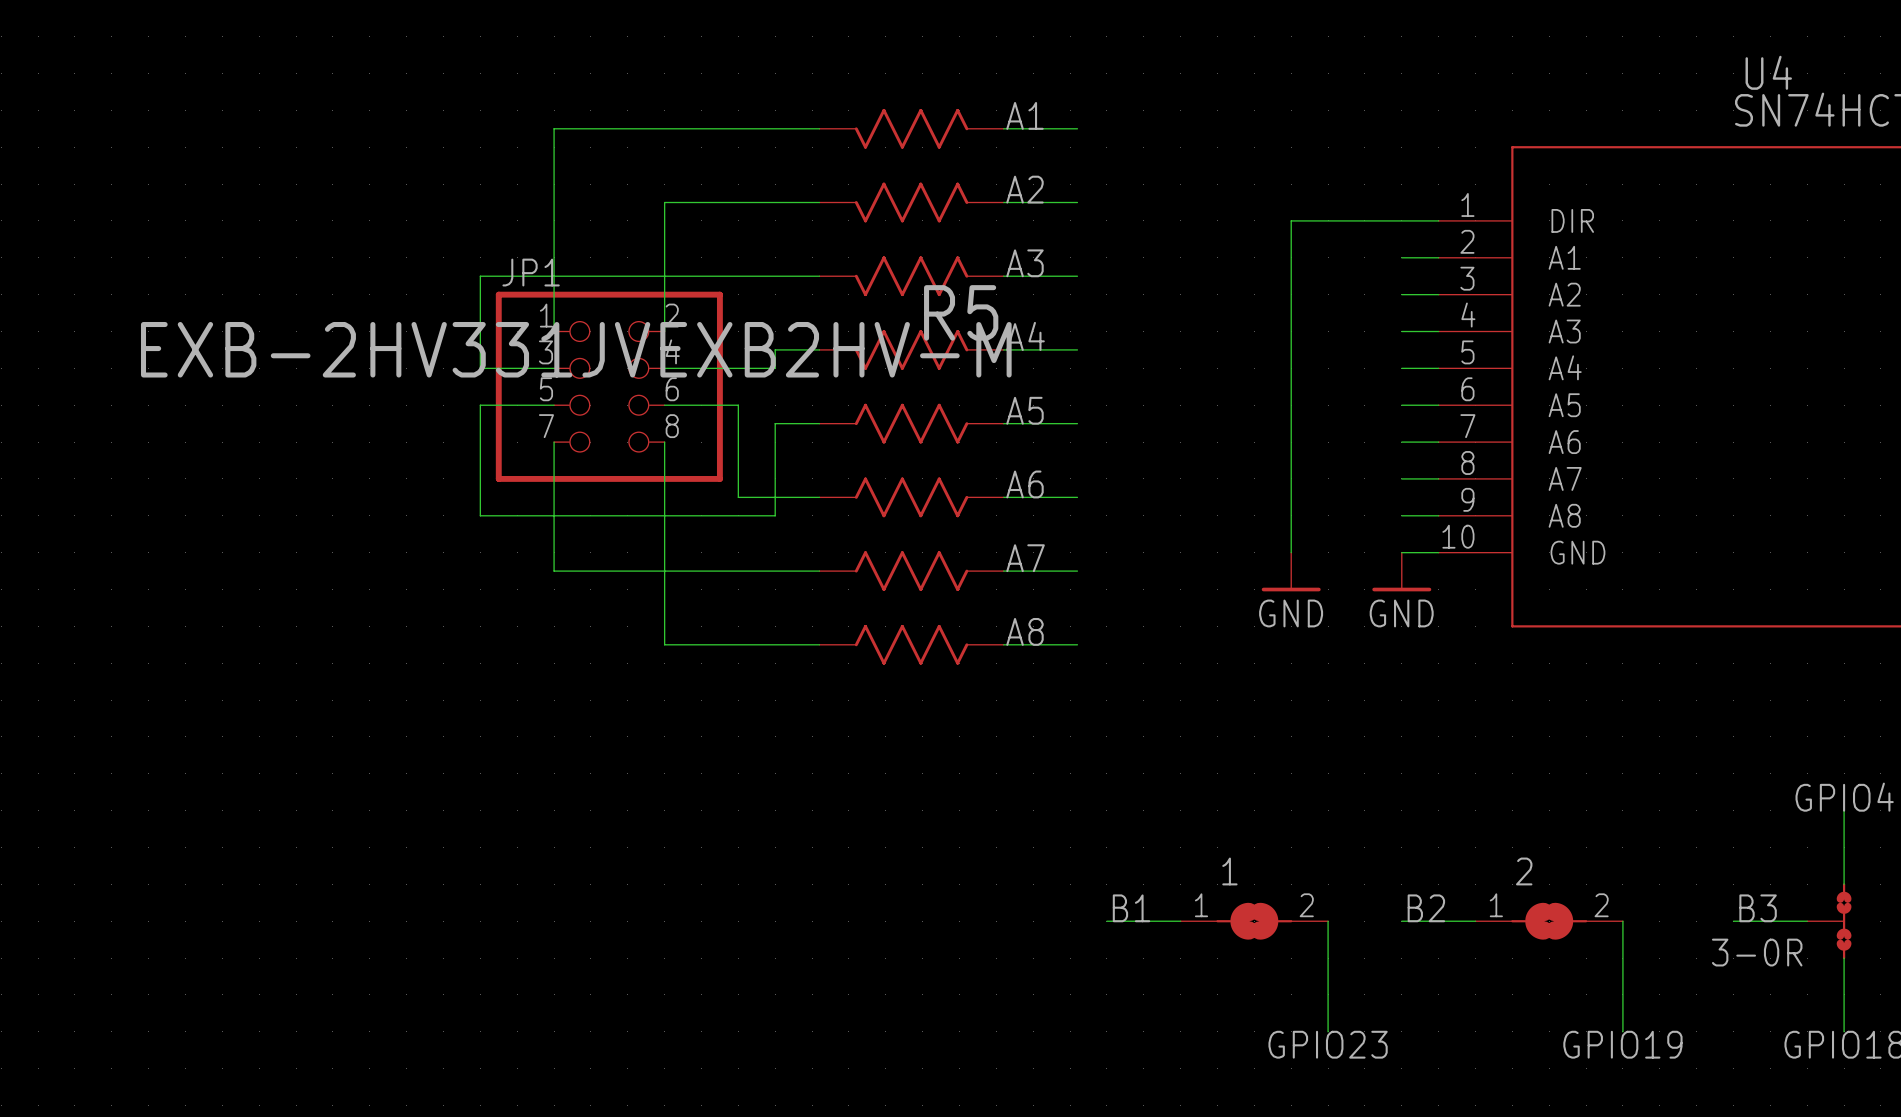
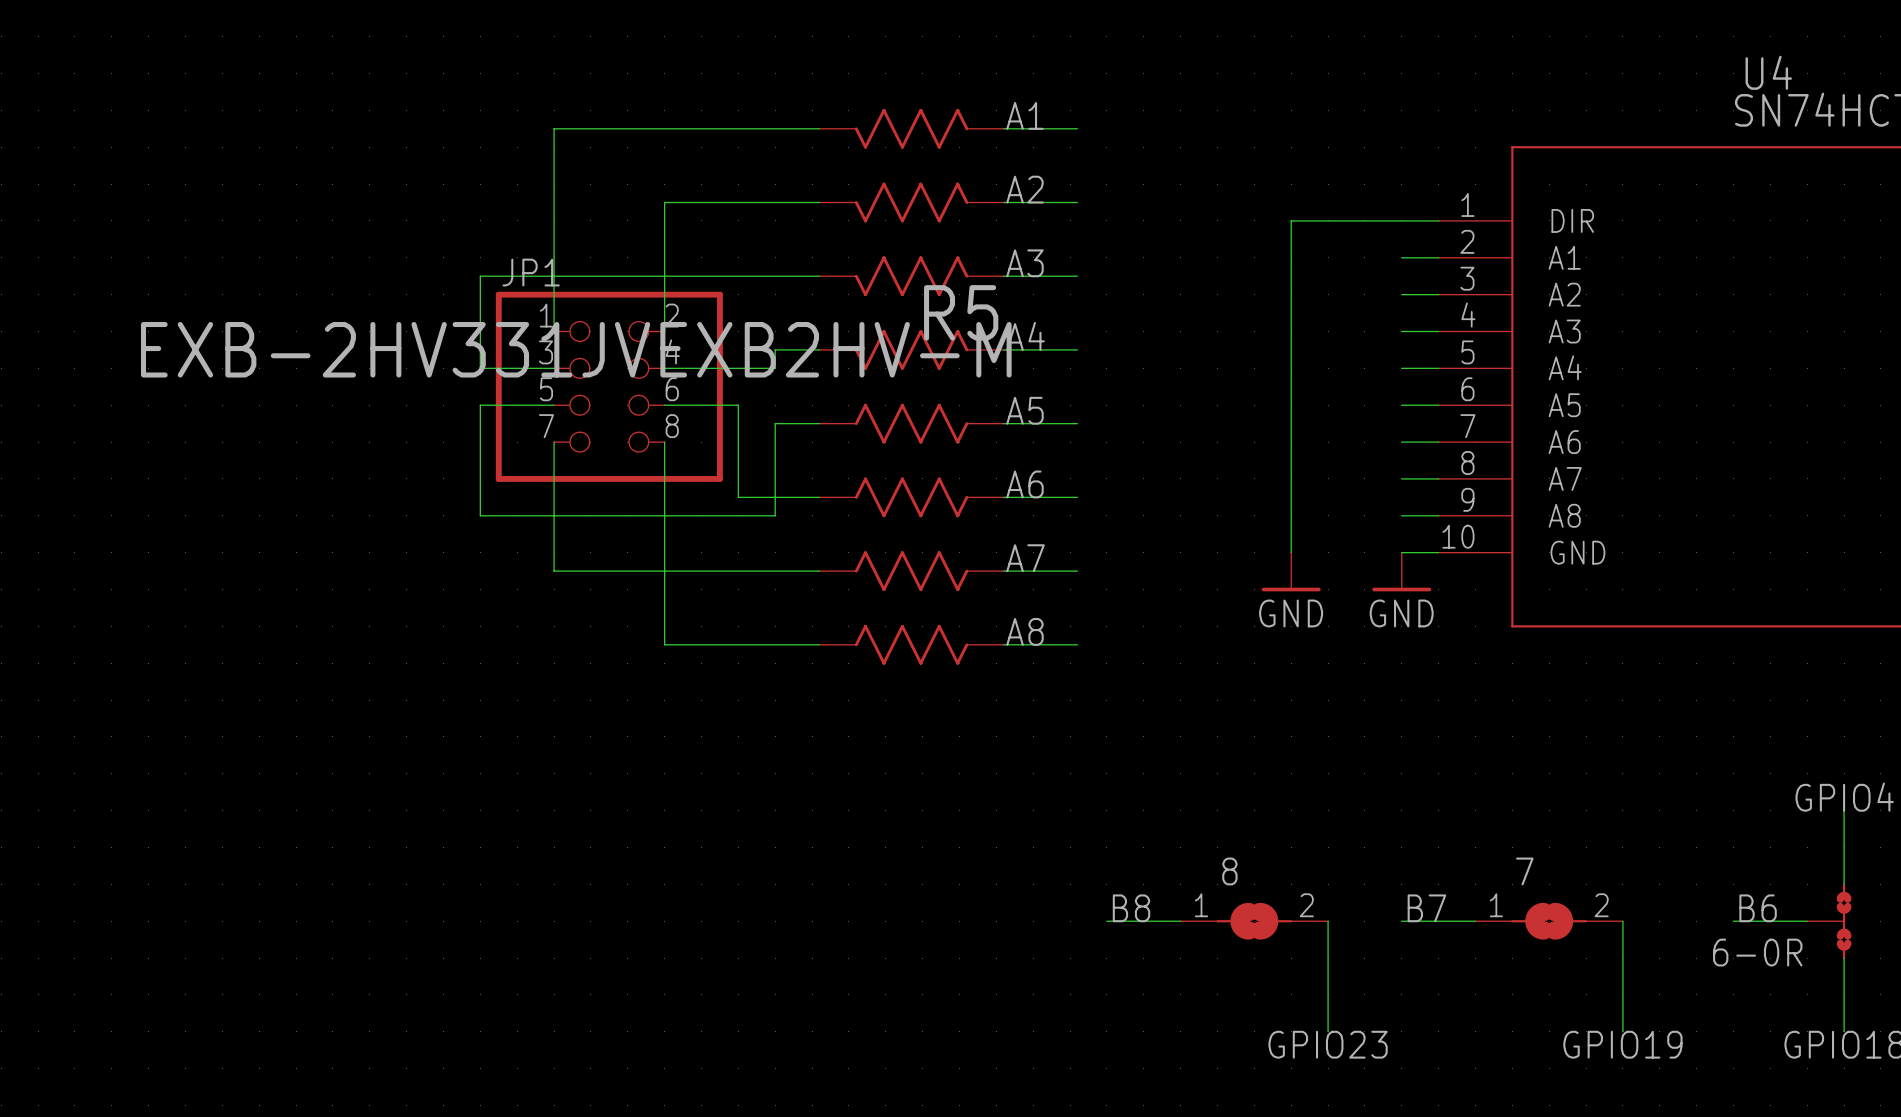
1 name: 1 (1229, 871) -> 8 (1229, 871)
2 name: 2 (1524, 871) -> 7 (1524, 871)
label: B1 (1131, 908) -> B8 (1131, 908)
label: B2 (1426, 908) -> B7 (1426, 908)
label: B3 (1758, 908) -> B6 (1758, 908)
3-0R name: 3-0R (1757, 952) -> 6-0R (1757, 952)

